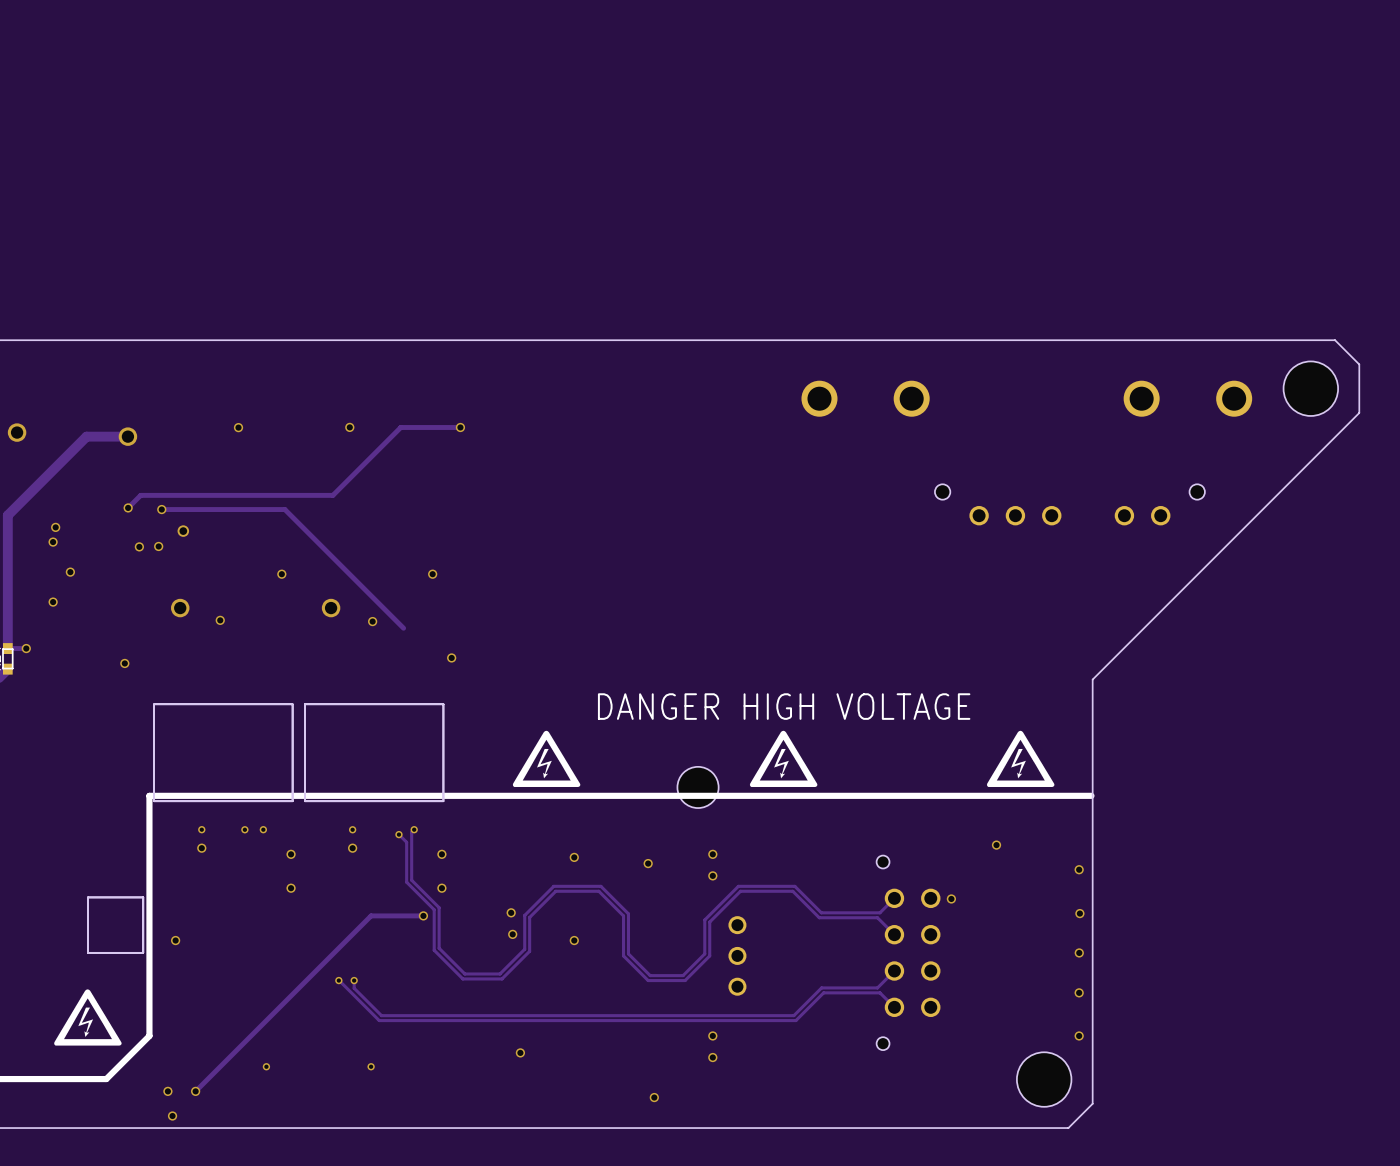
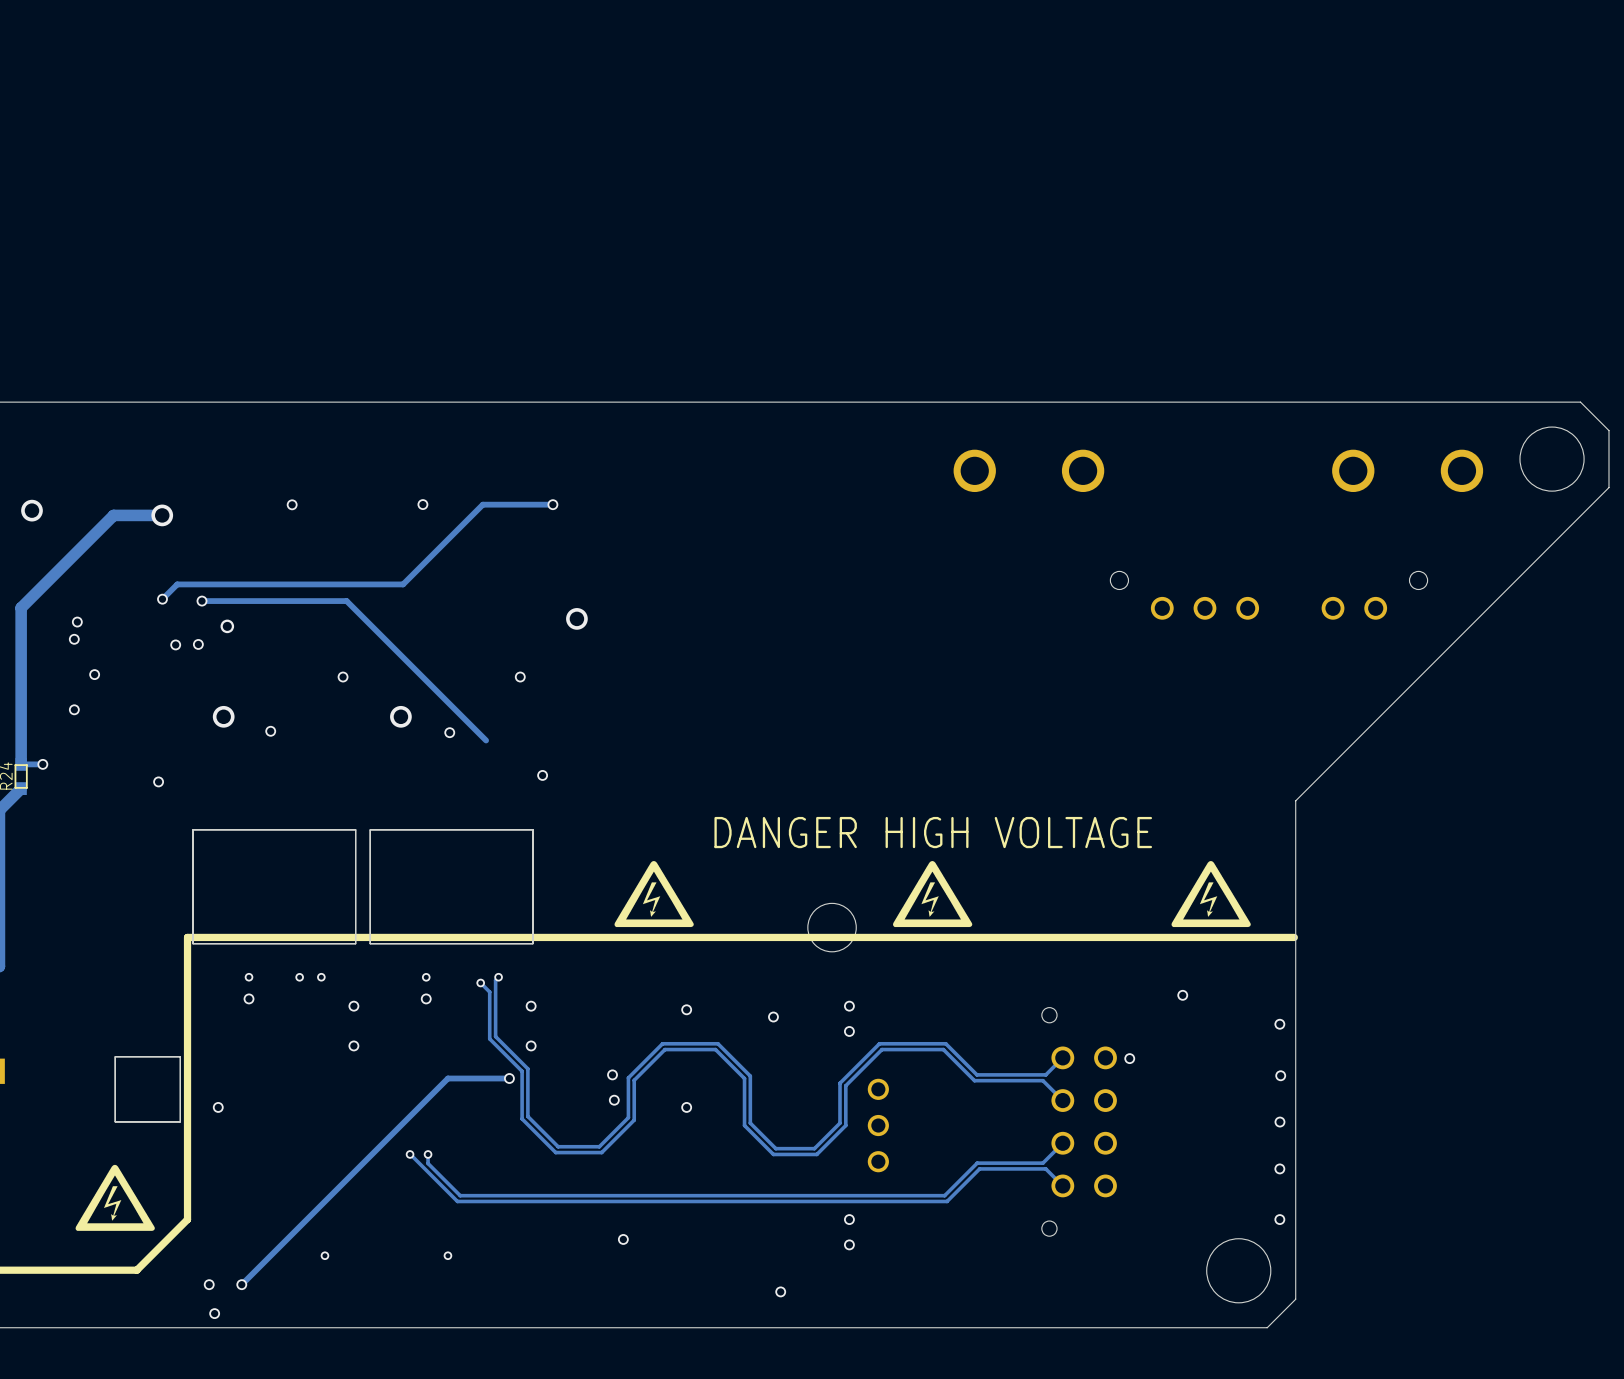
via: none -> (576, 618)

